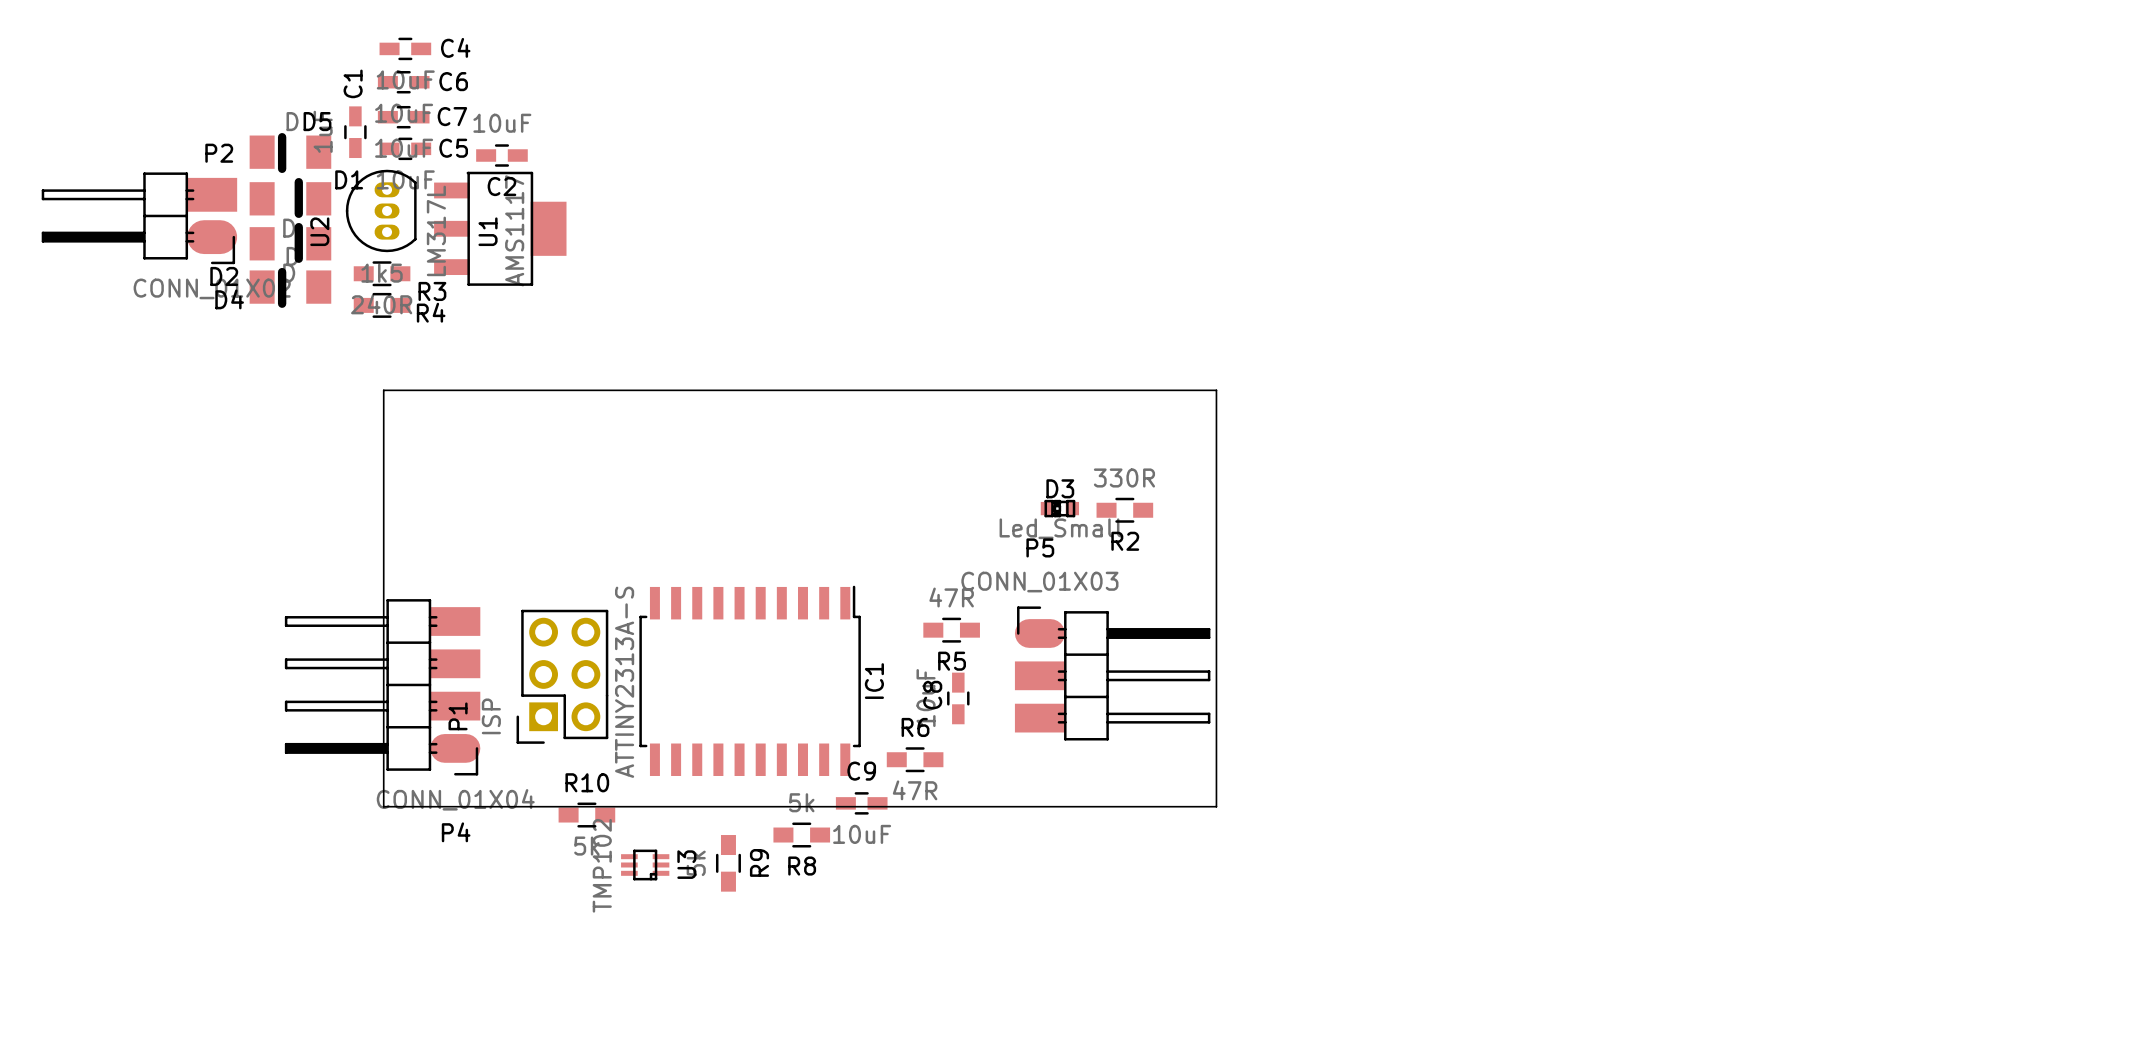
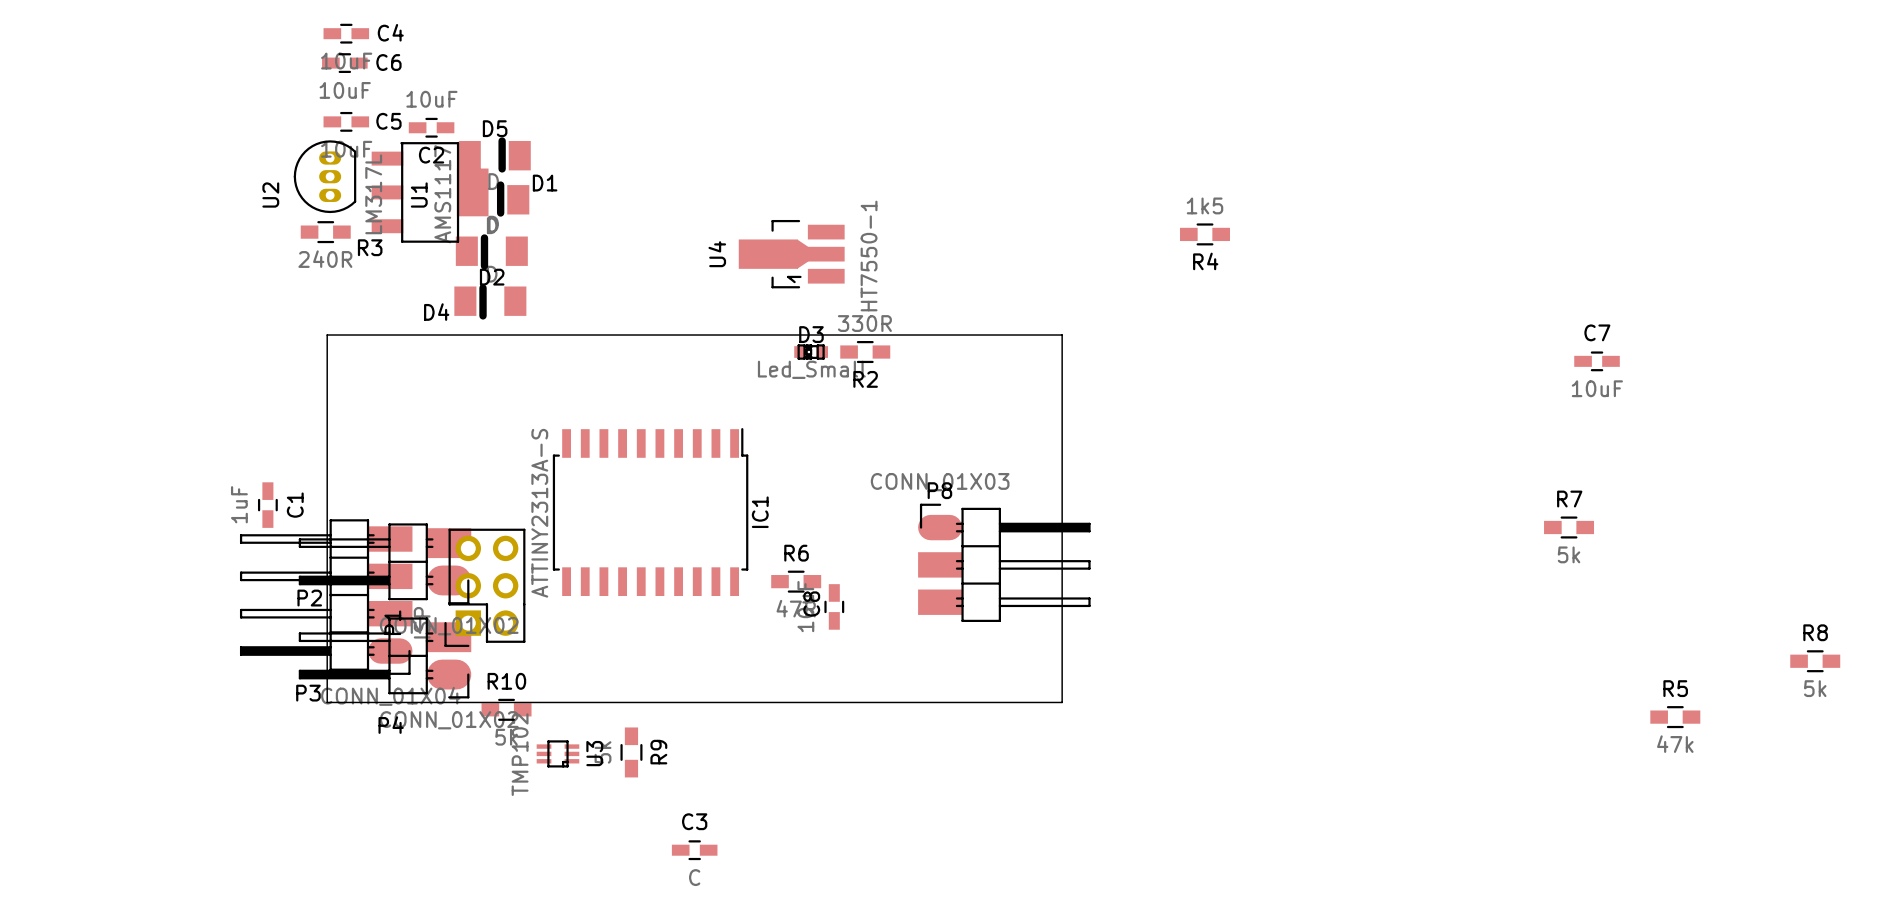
C1 name position: C1 (353, 83) -> C1 (295, 505)
C7 name position: C7 (452, 116) -> C7 (1597, 332)
C7 position: (403, 117) -> (1597, 361)
C1 position: (355, 132) -> (267, 505)
P2 name position: P2 (219, 153) -> P2 (309, 598)
D5 rotation: 0° (290, 153) -> 180° (494, 154)
D5 position: (290, 153) -> (494, 154)
D1 position: (290, 197) -> (493, 199)
P2 position: (139, 218) -> (385, 563)
D2 rotation: 0° (290, 242) -> 180° (491, 251)
D2 position: (290, 242) -> (491, 251)
D2 name position: D2 (224, 276) -> D2 (492, 277)
D4 position: (290, 287) -> (490, 301)
U4: none -> HT7550-1 (791, 254)
R4 position: (382, 305) -> (1205, 234)
R4 name position: R4 (431, 312) -> R4 (1205, 261)
D3 position: (1059, 508) -> (811, 352)
R2 position: (1124, 510) -> (865, 352)
R5 value: 47R (951, 597) -> 47k (1675, 744)
R7: none -> 5k (1569, 527)
R5 position: (951, 630) -> (1675, 717)
P8: none -> CONN_01X03 (1004, 562)
R5 name position: R5 (952, 661) -> R5 (1675, 688)
P5: CONN_01X03 (1112, 673) -> none
IC1 position: (750, 680) -> (650, 512)
P3: none -> CONN_01X02 (385, 657)
R6 position: (915, 759) -> (796, 581)
R8 value position: 5k (801, 802) -> 5k (1815, 688)
C9: 10uF (861, 803) -> none
R8 position: (801, 835) -> (1815, 661)
R8 name position: R8 (802, 866) -> R8 (1815, 632)
C3: none -> C (694, 850)

